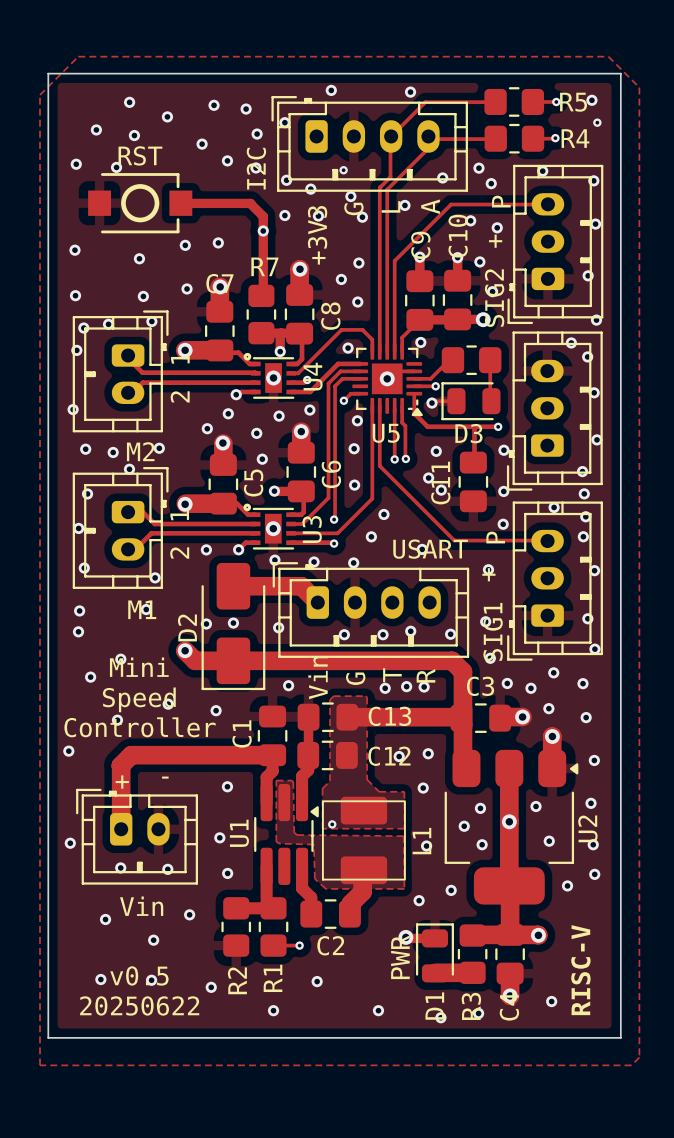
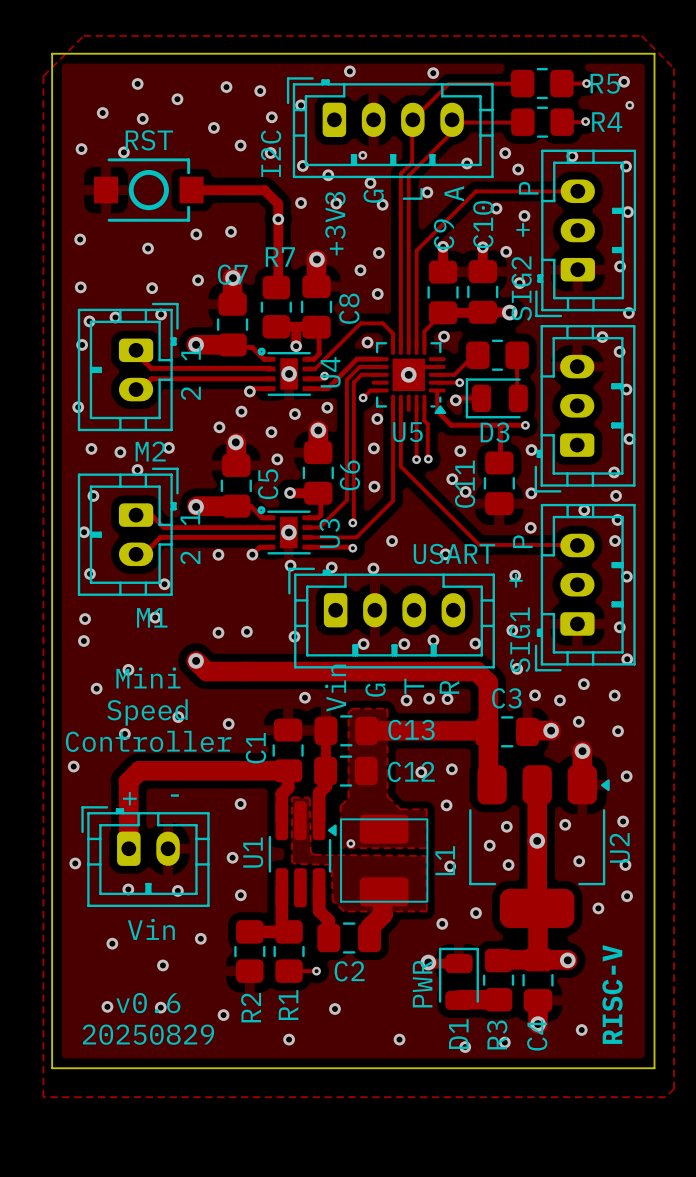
via: (383, 514) -> none
track: (233, 586) (301, 586) (317, 602) -> none
D2: (233, 626) -> none
text: v0.5 (139, 975) -> v0.6 (148, 1003)
text: 20250622 (139, 1005) -> 20250829 (148, 1034)

